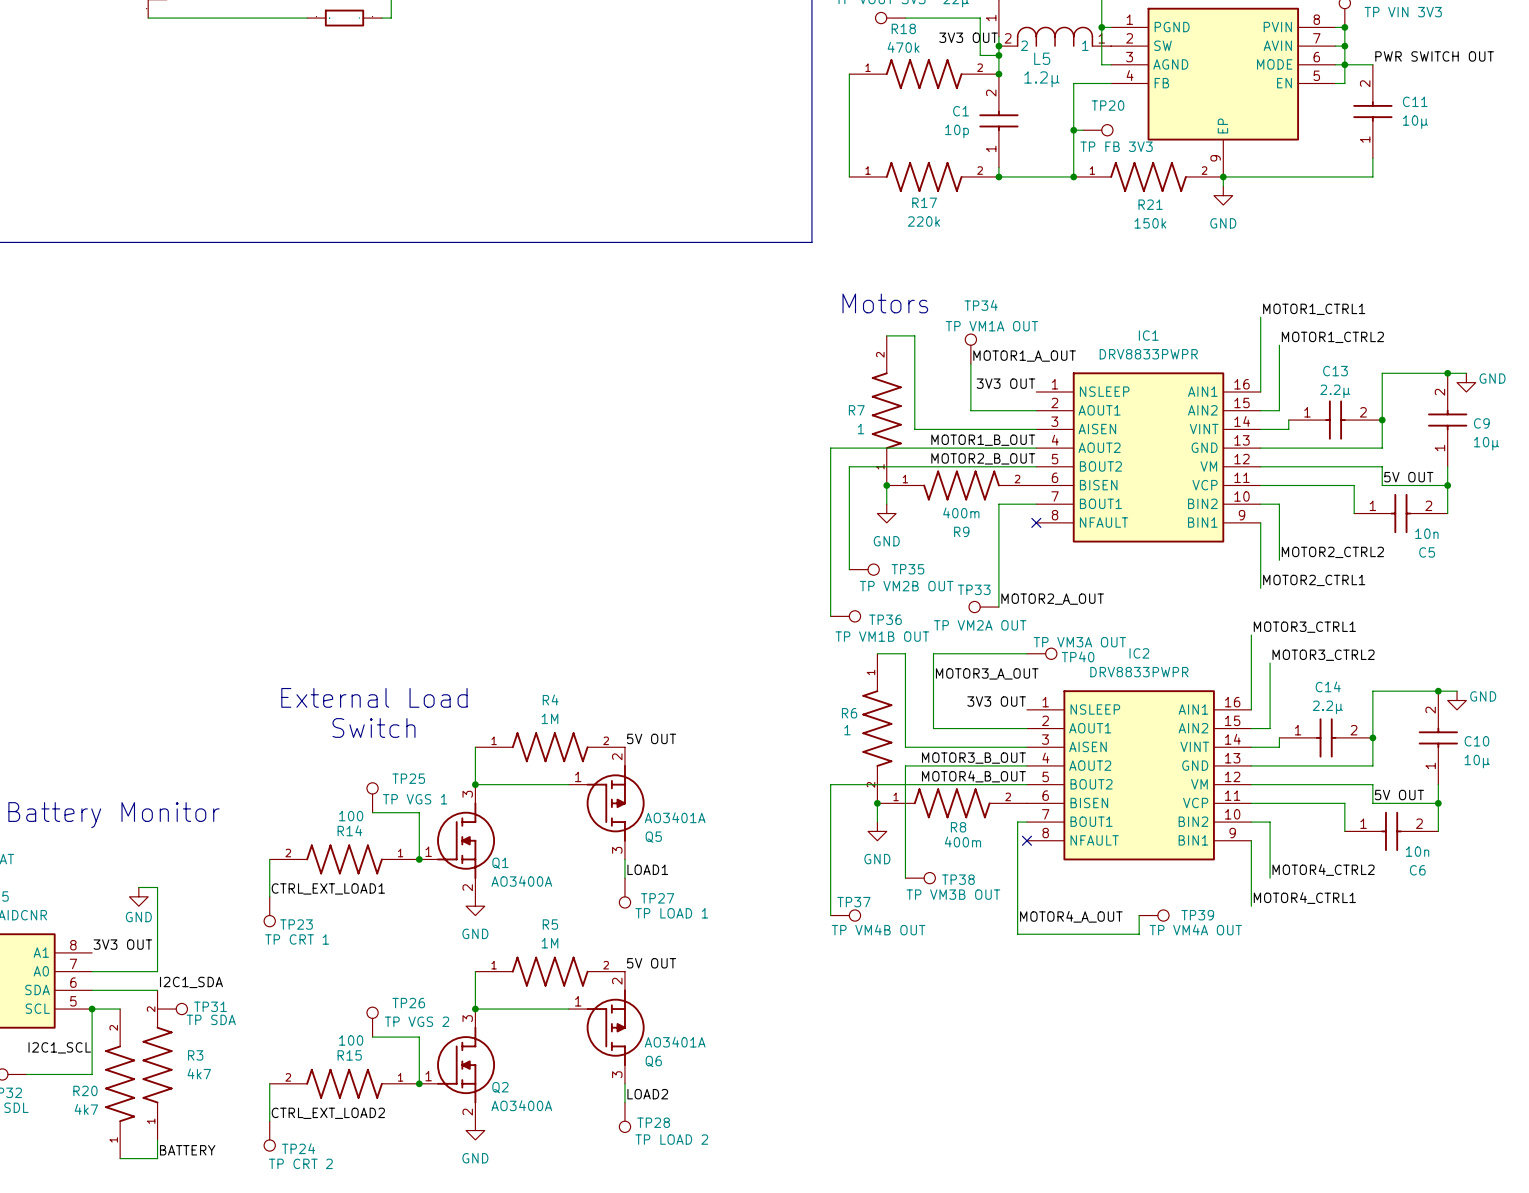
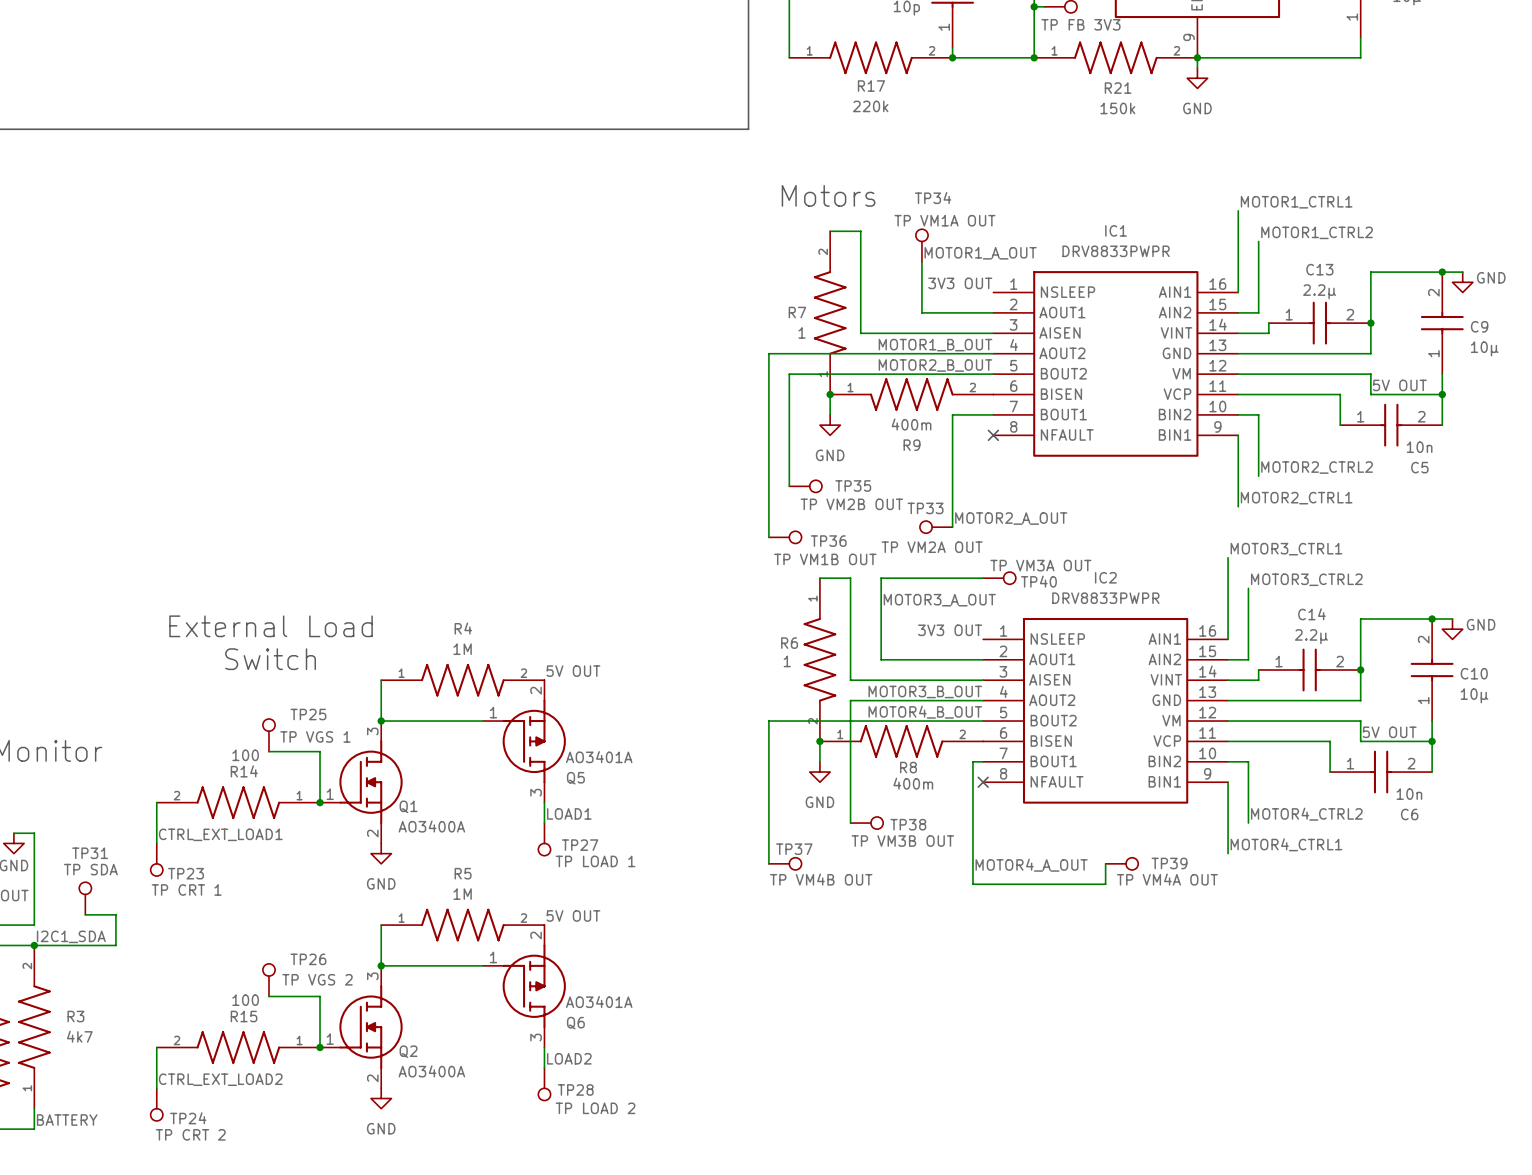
wire: none -> (85, 914) (115, 914) (115, 945) (34, 945)
junction: none -> (34, 945)
TP31 position: (172, 1009) -> (85, 898)
TP31 rotation: 0° (181, 1009) -> 90° counterclockwise (85, 888)
TP31 value position: TP SDA (211, 1019) -> TP SDA (90, 869)

